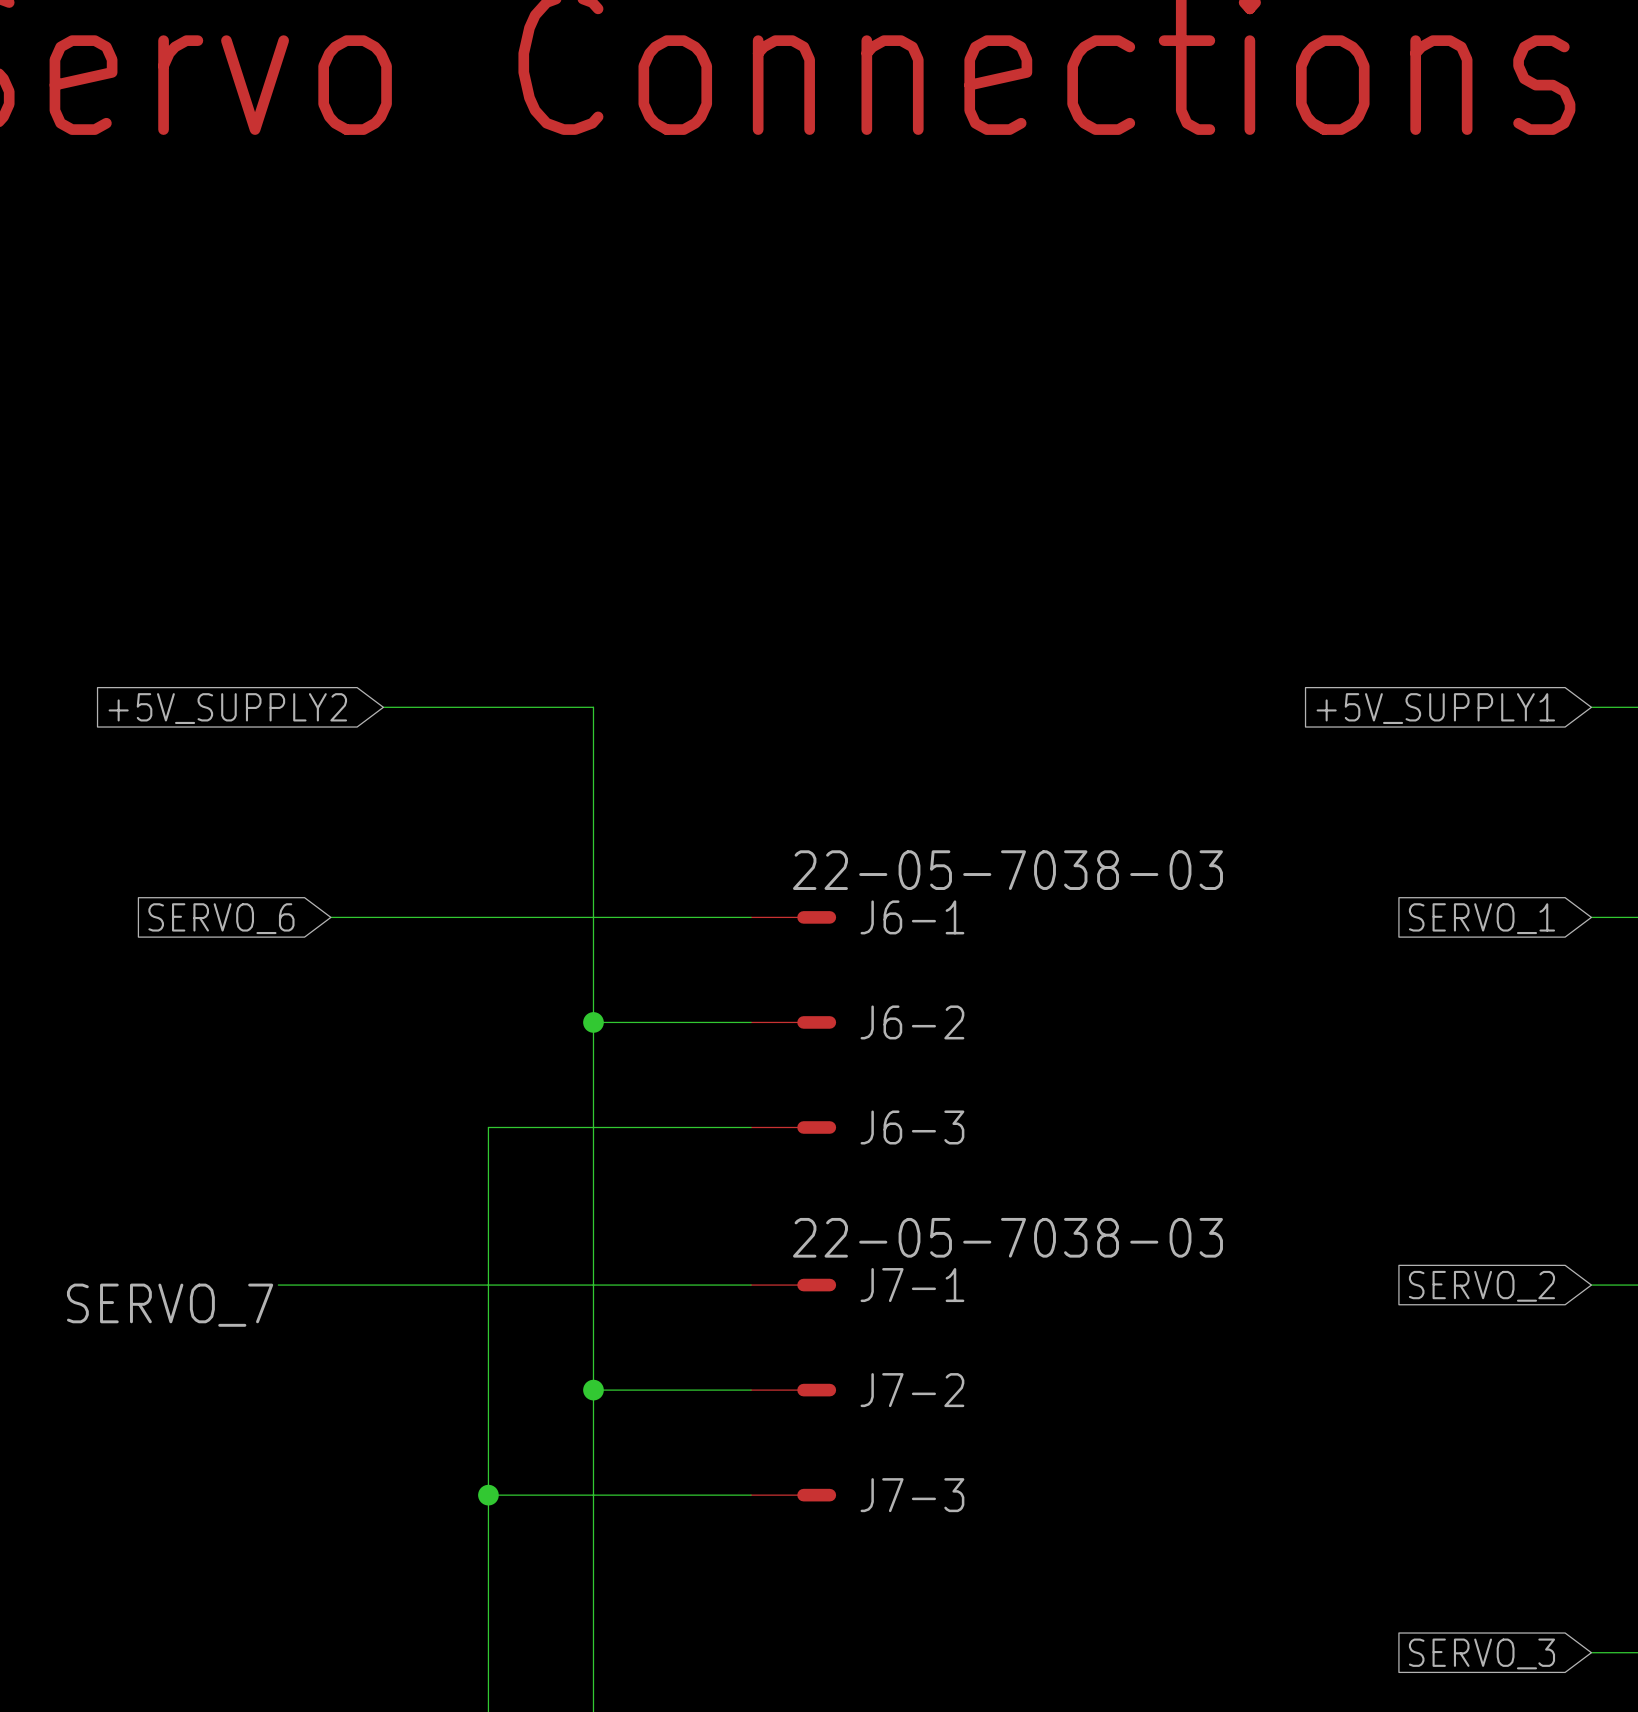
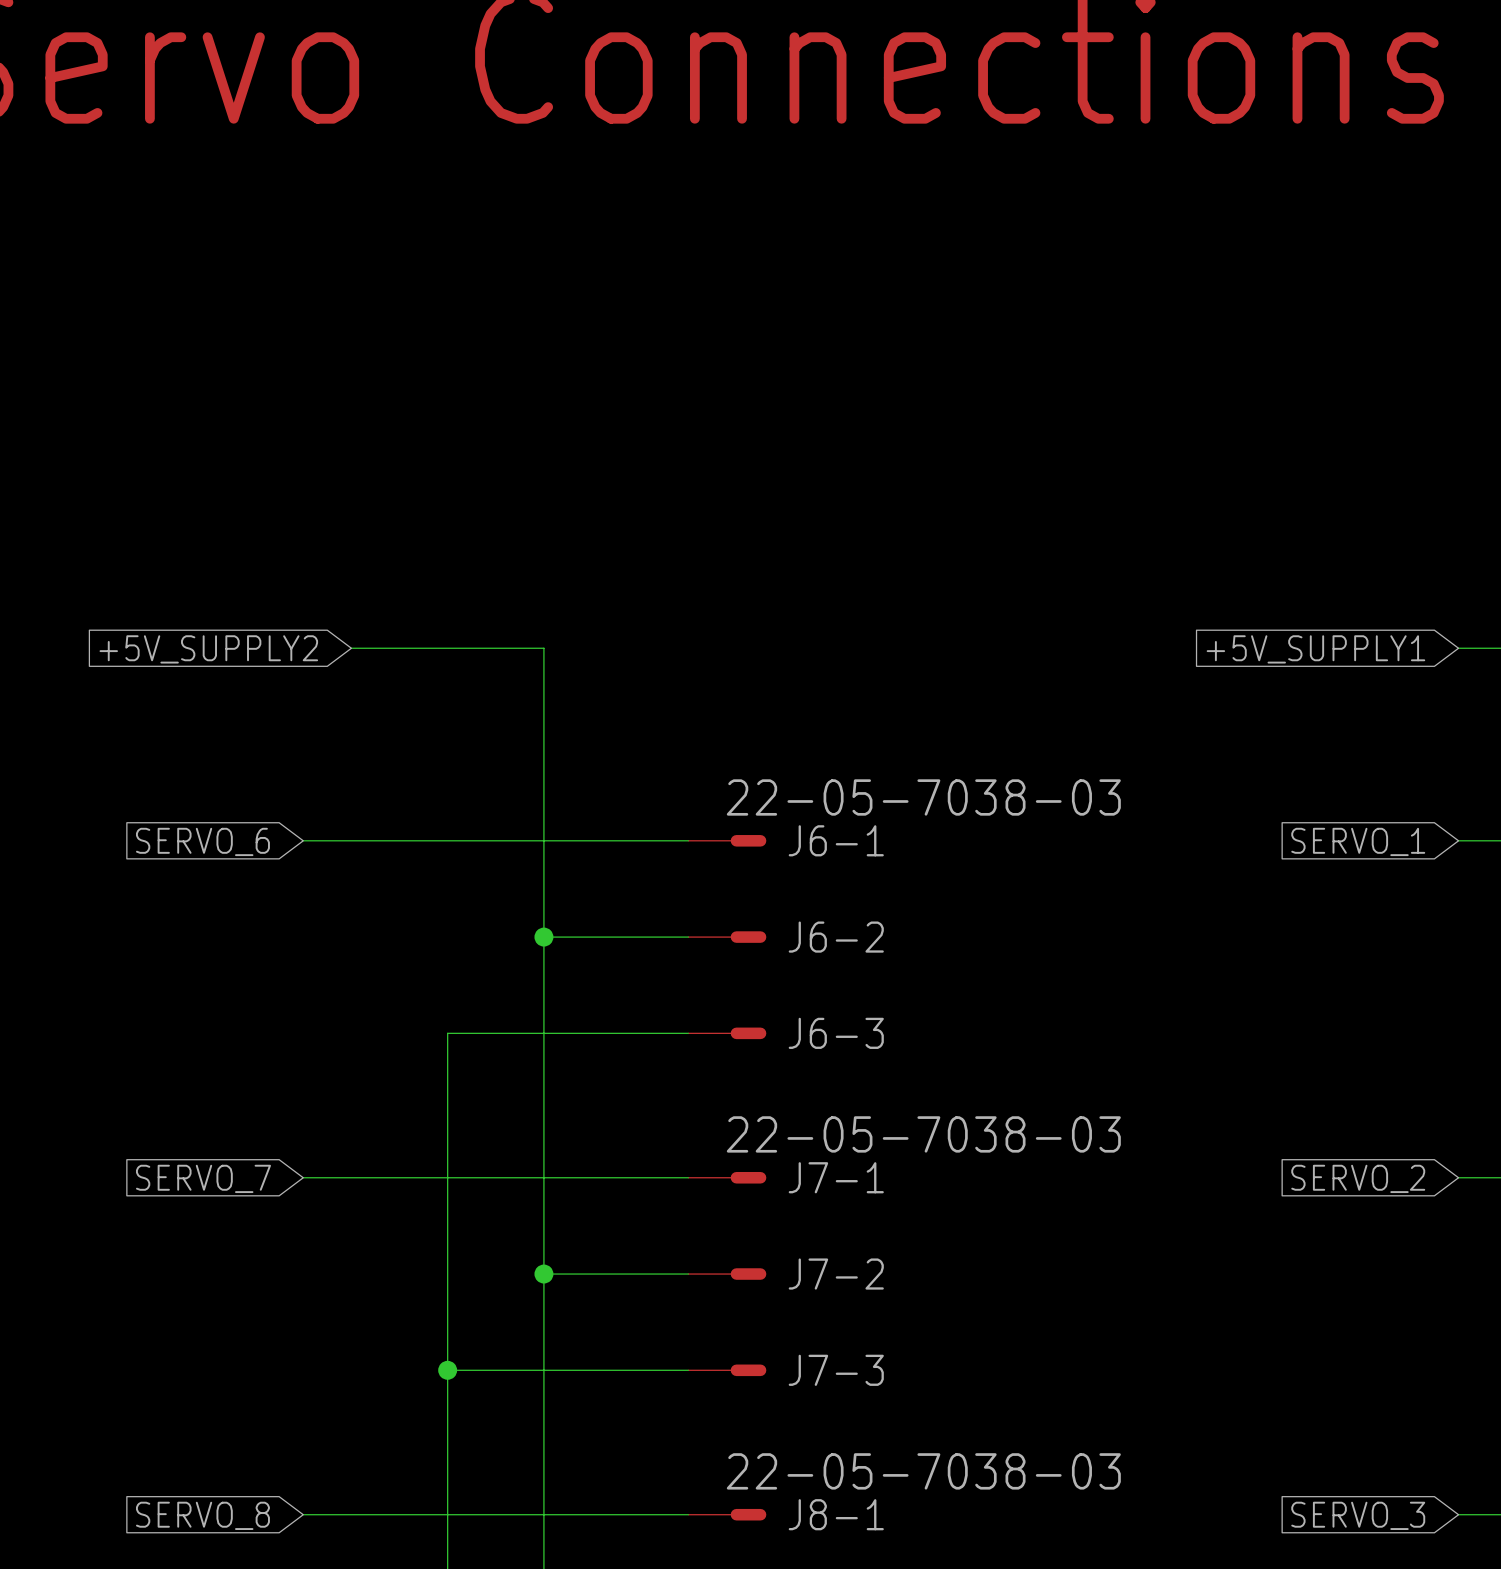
wire: (278, 1285) (330, 1285) -> none
global label: none -> SERVO_7 (203, 1178)
label: SERVO_7 (170, 1305) -> none
wire: none -> (303, 1514) (688, 1514)
J8-1: none -> 22-05-7038-03 (727, 1514)
global label: none -> SERVO_8 (202, 1515)

